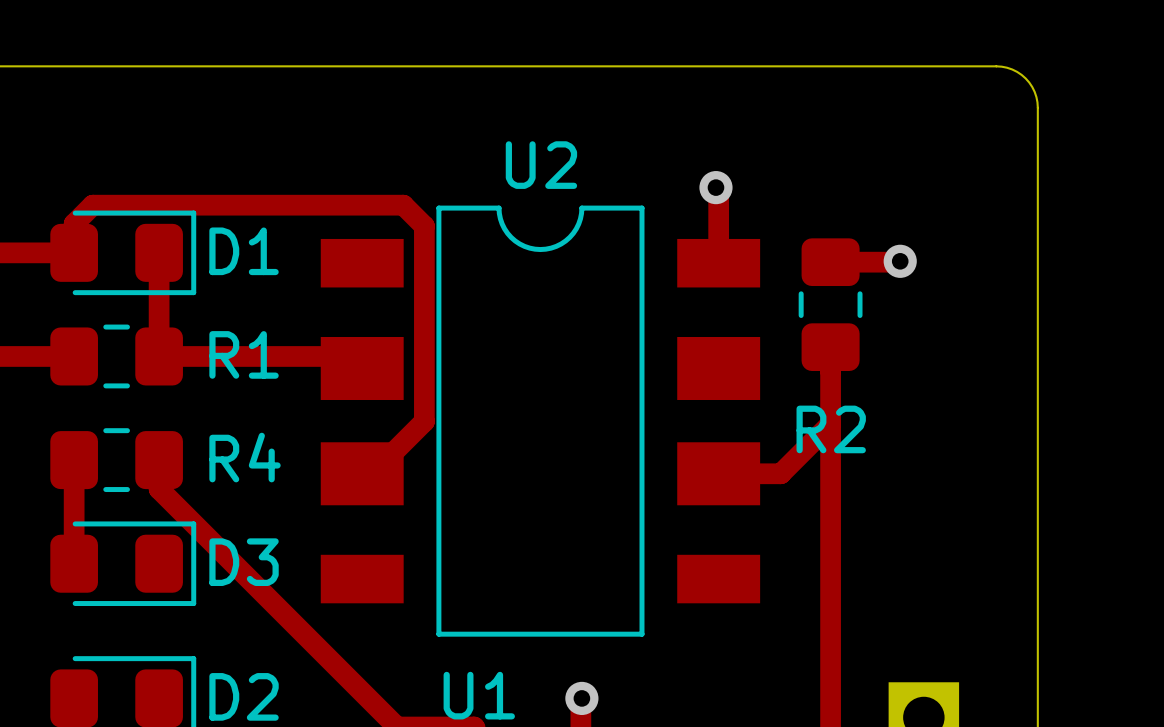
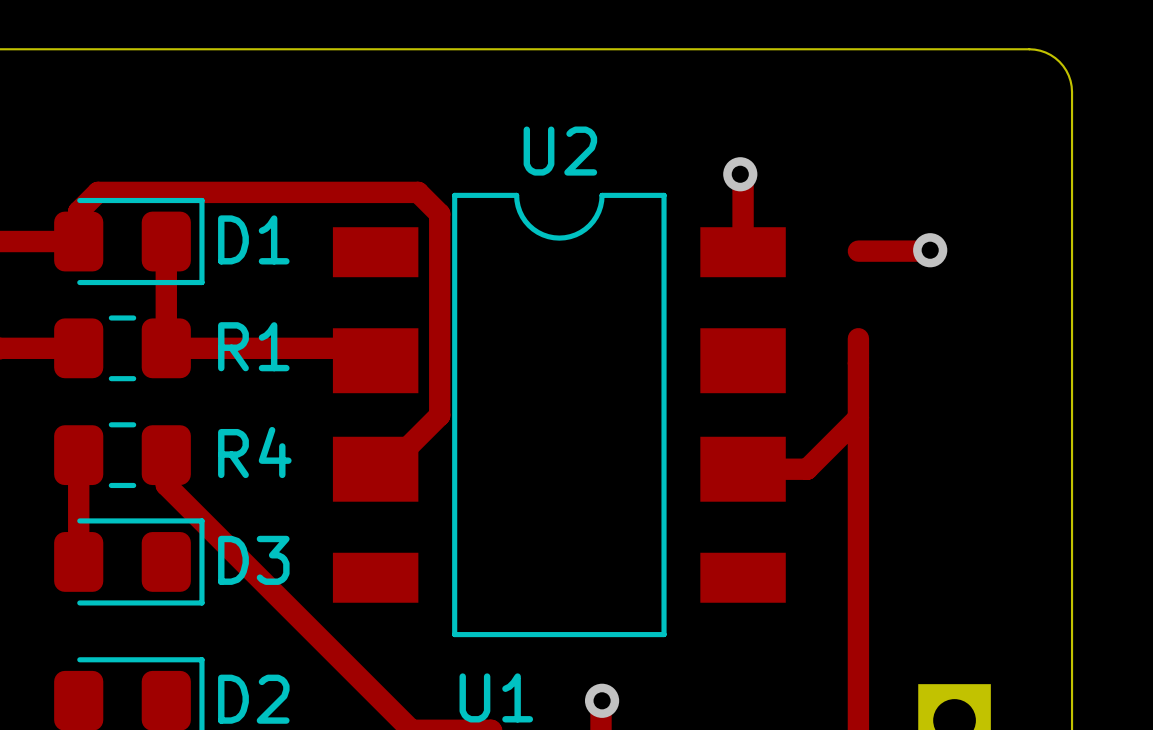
R2: (830, 304) -> none

